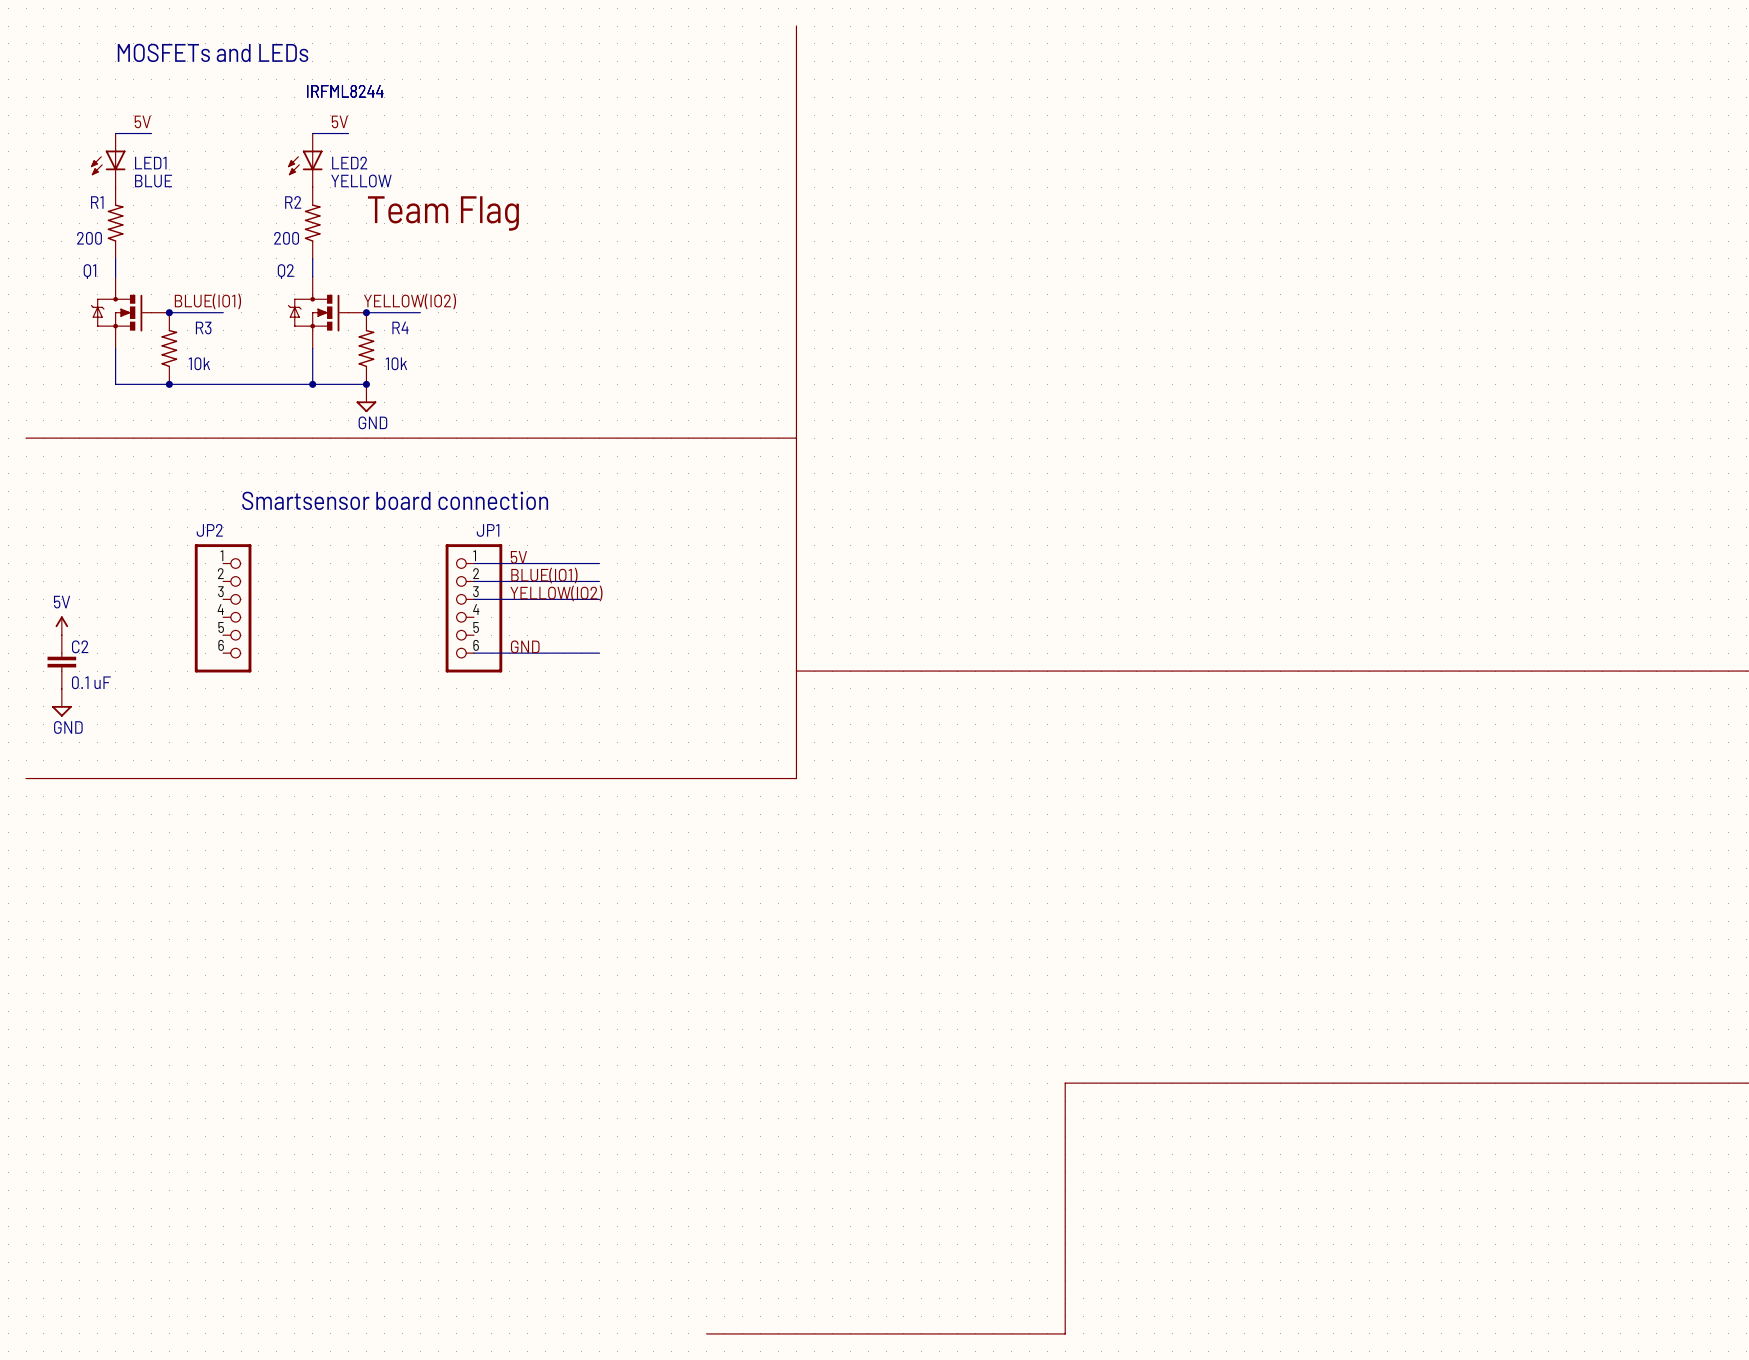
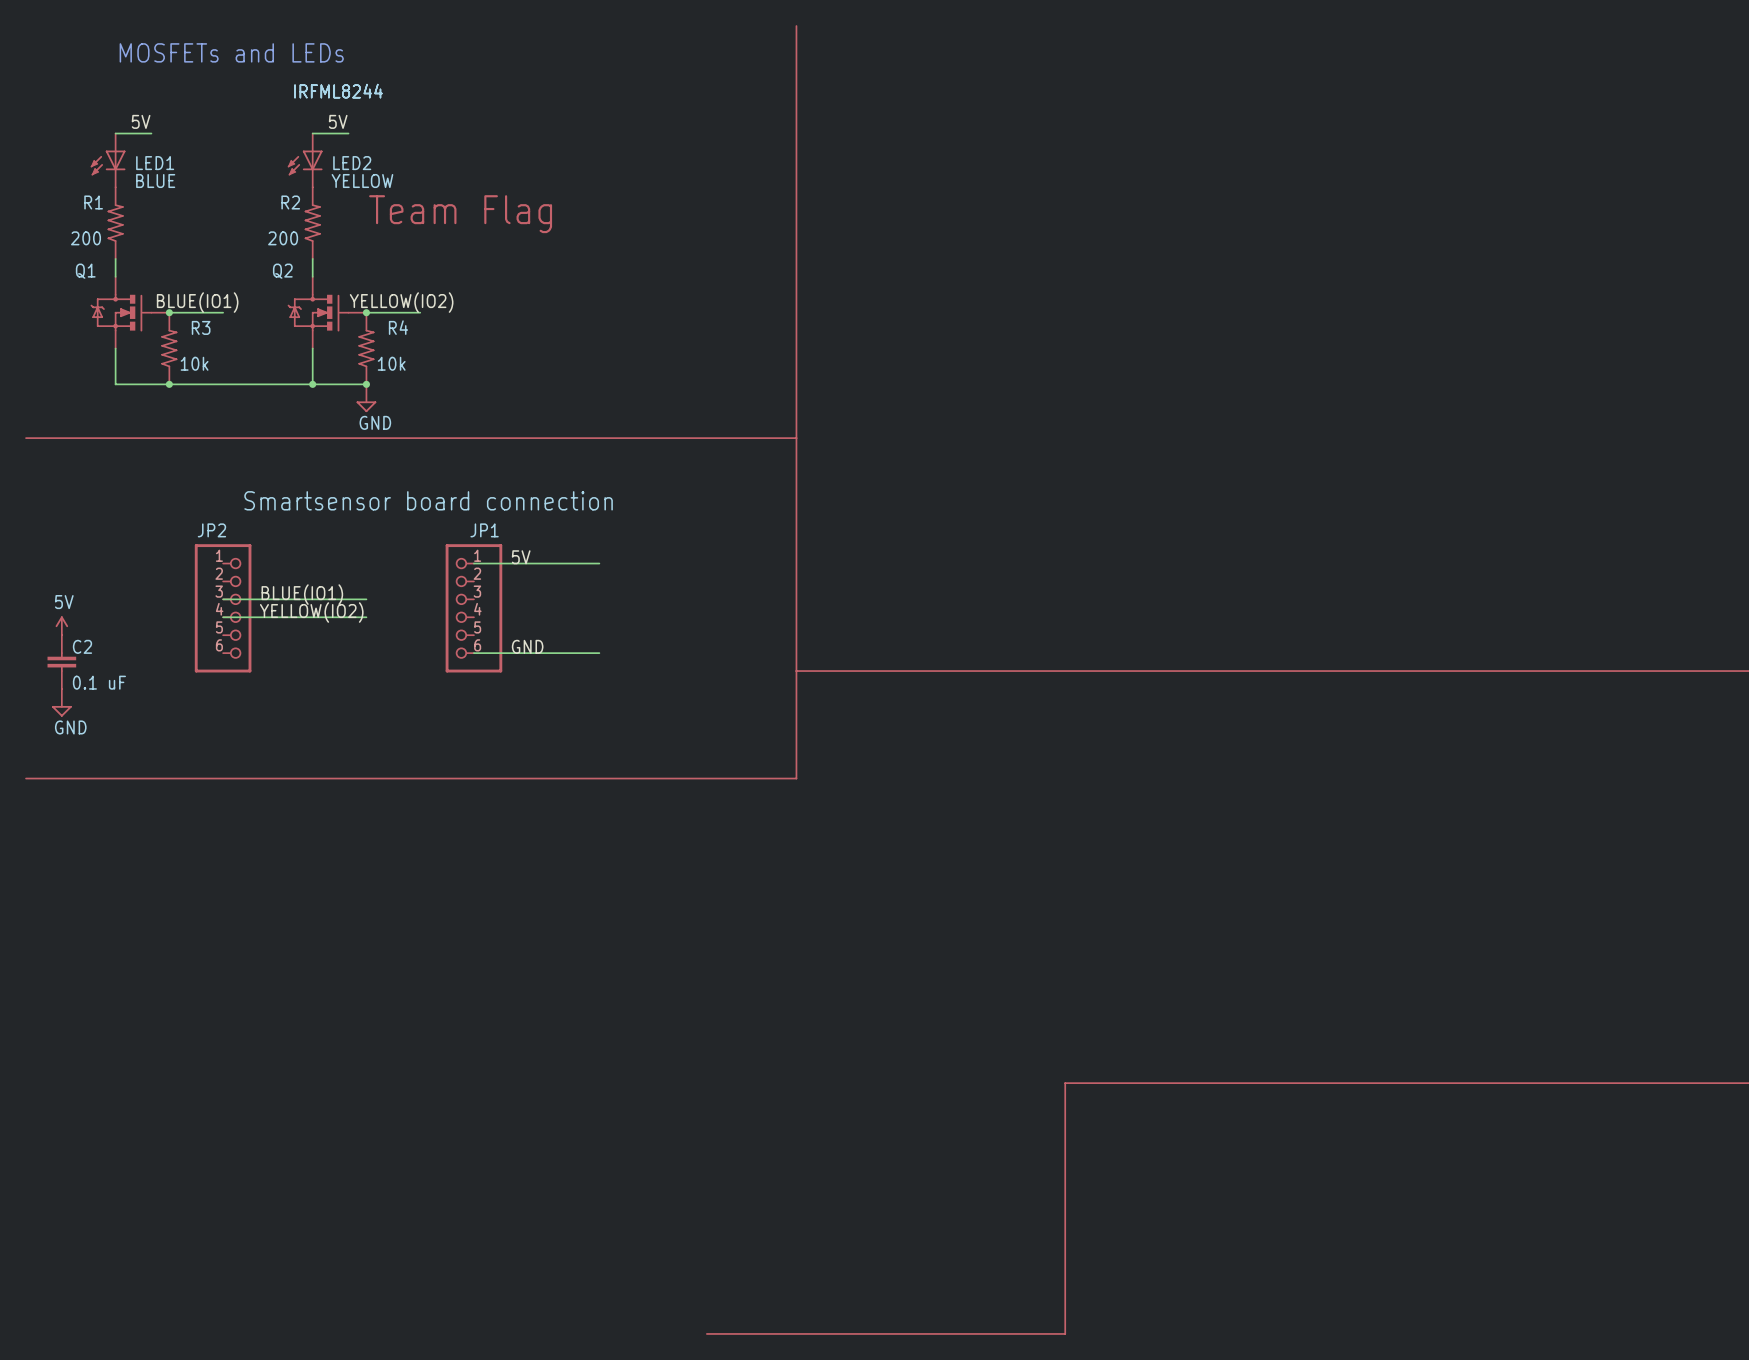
label: BLUE(IO1) (544, 575) -> none
wire: (473, 581) (599, 581) -> none
label: none -> BLUE(IO1) (302, 594)
label: YELLOW(IO2) (556, 593) -> none
wire: none -> (223, 599) (366, 599)
wire: (473, 599) (599, 599) -> none
label: none -> YELLOW(IO2) (311, 612)
wire: none -> (223, 617) (366, 617)

